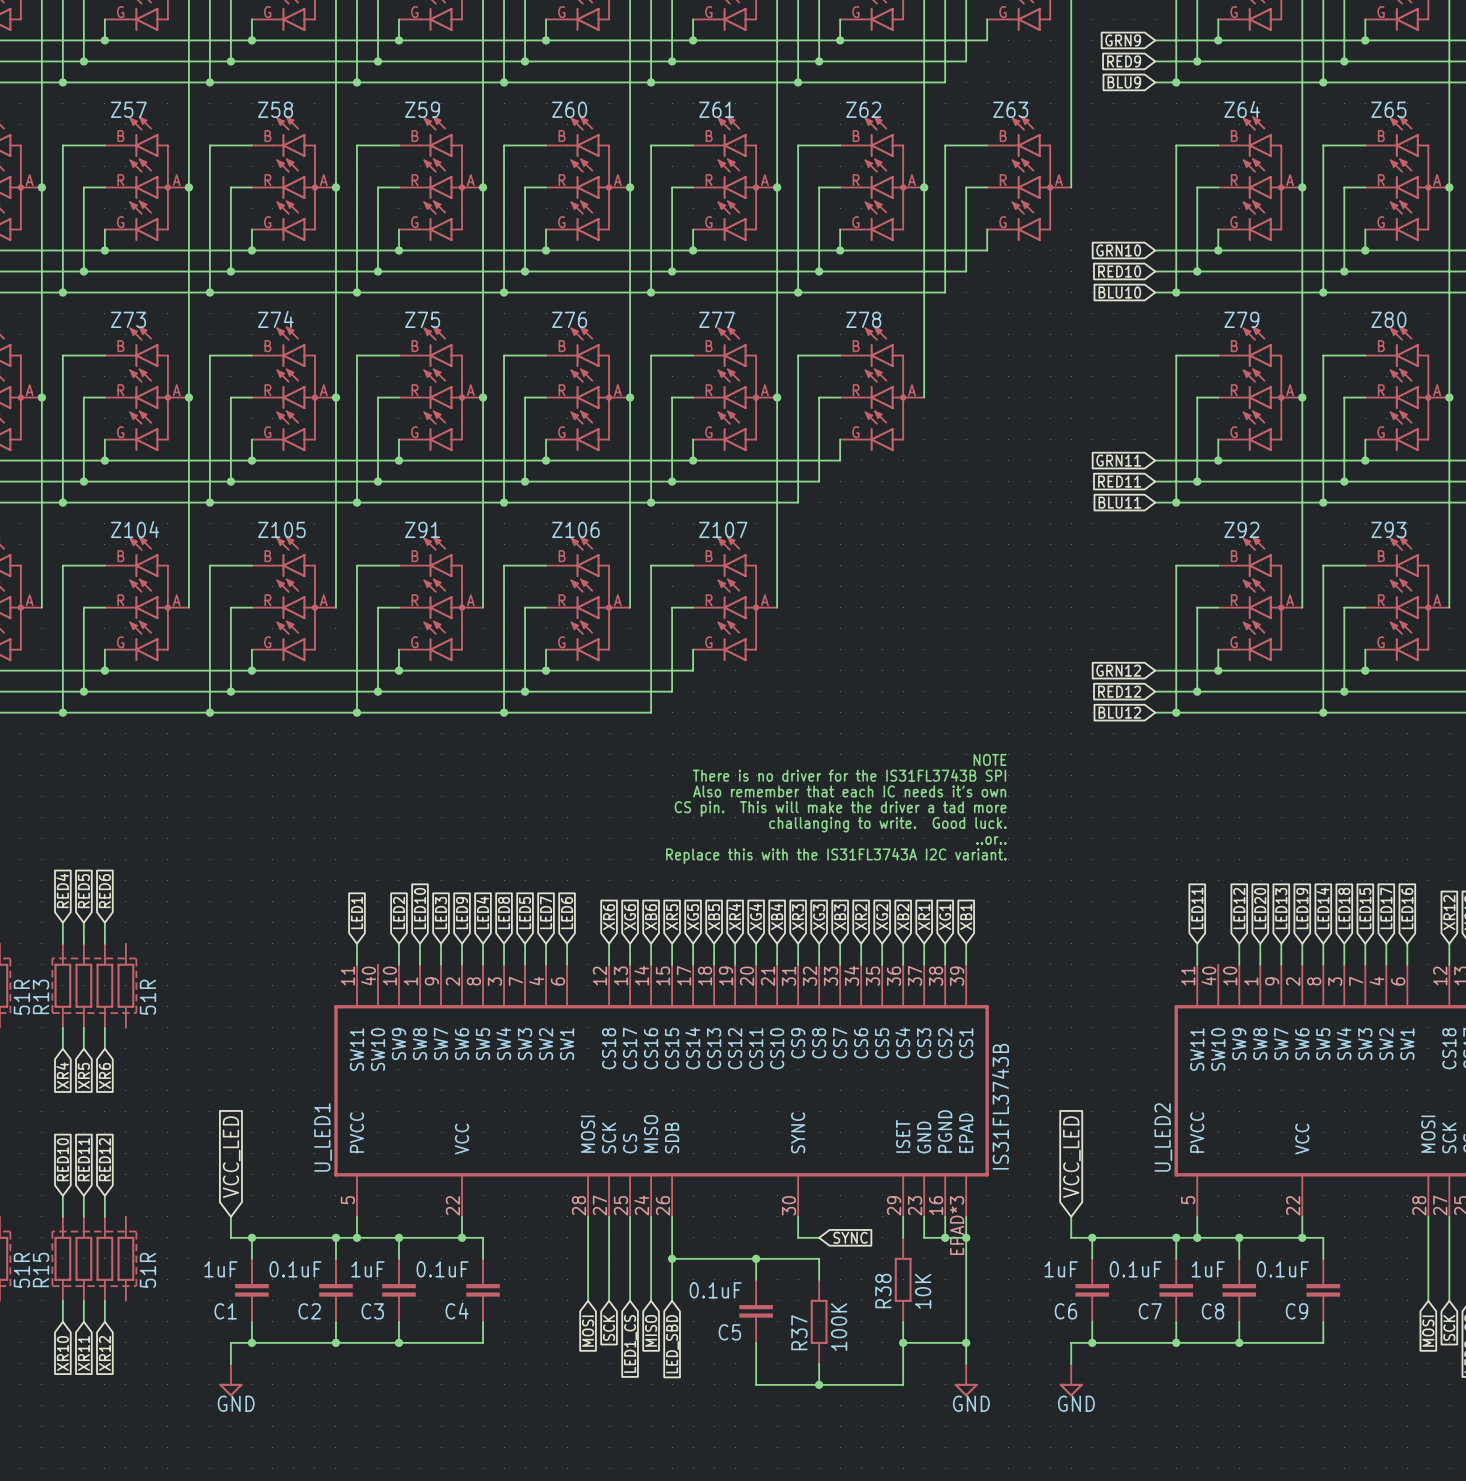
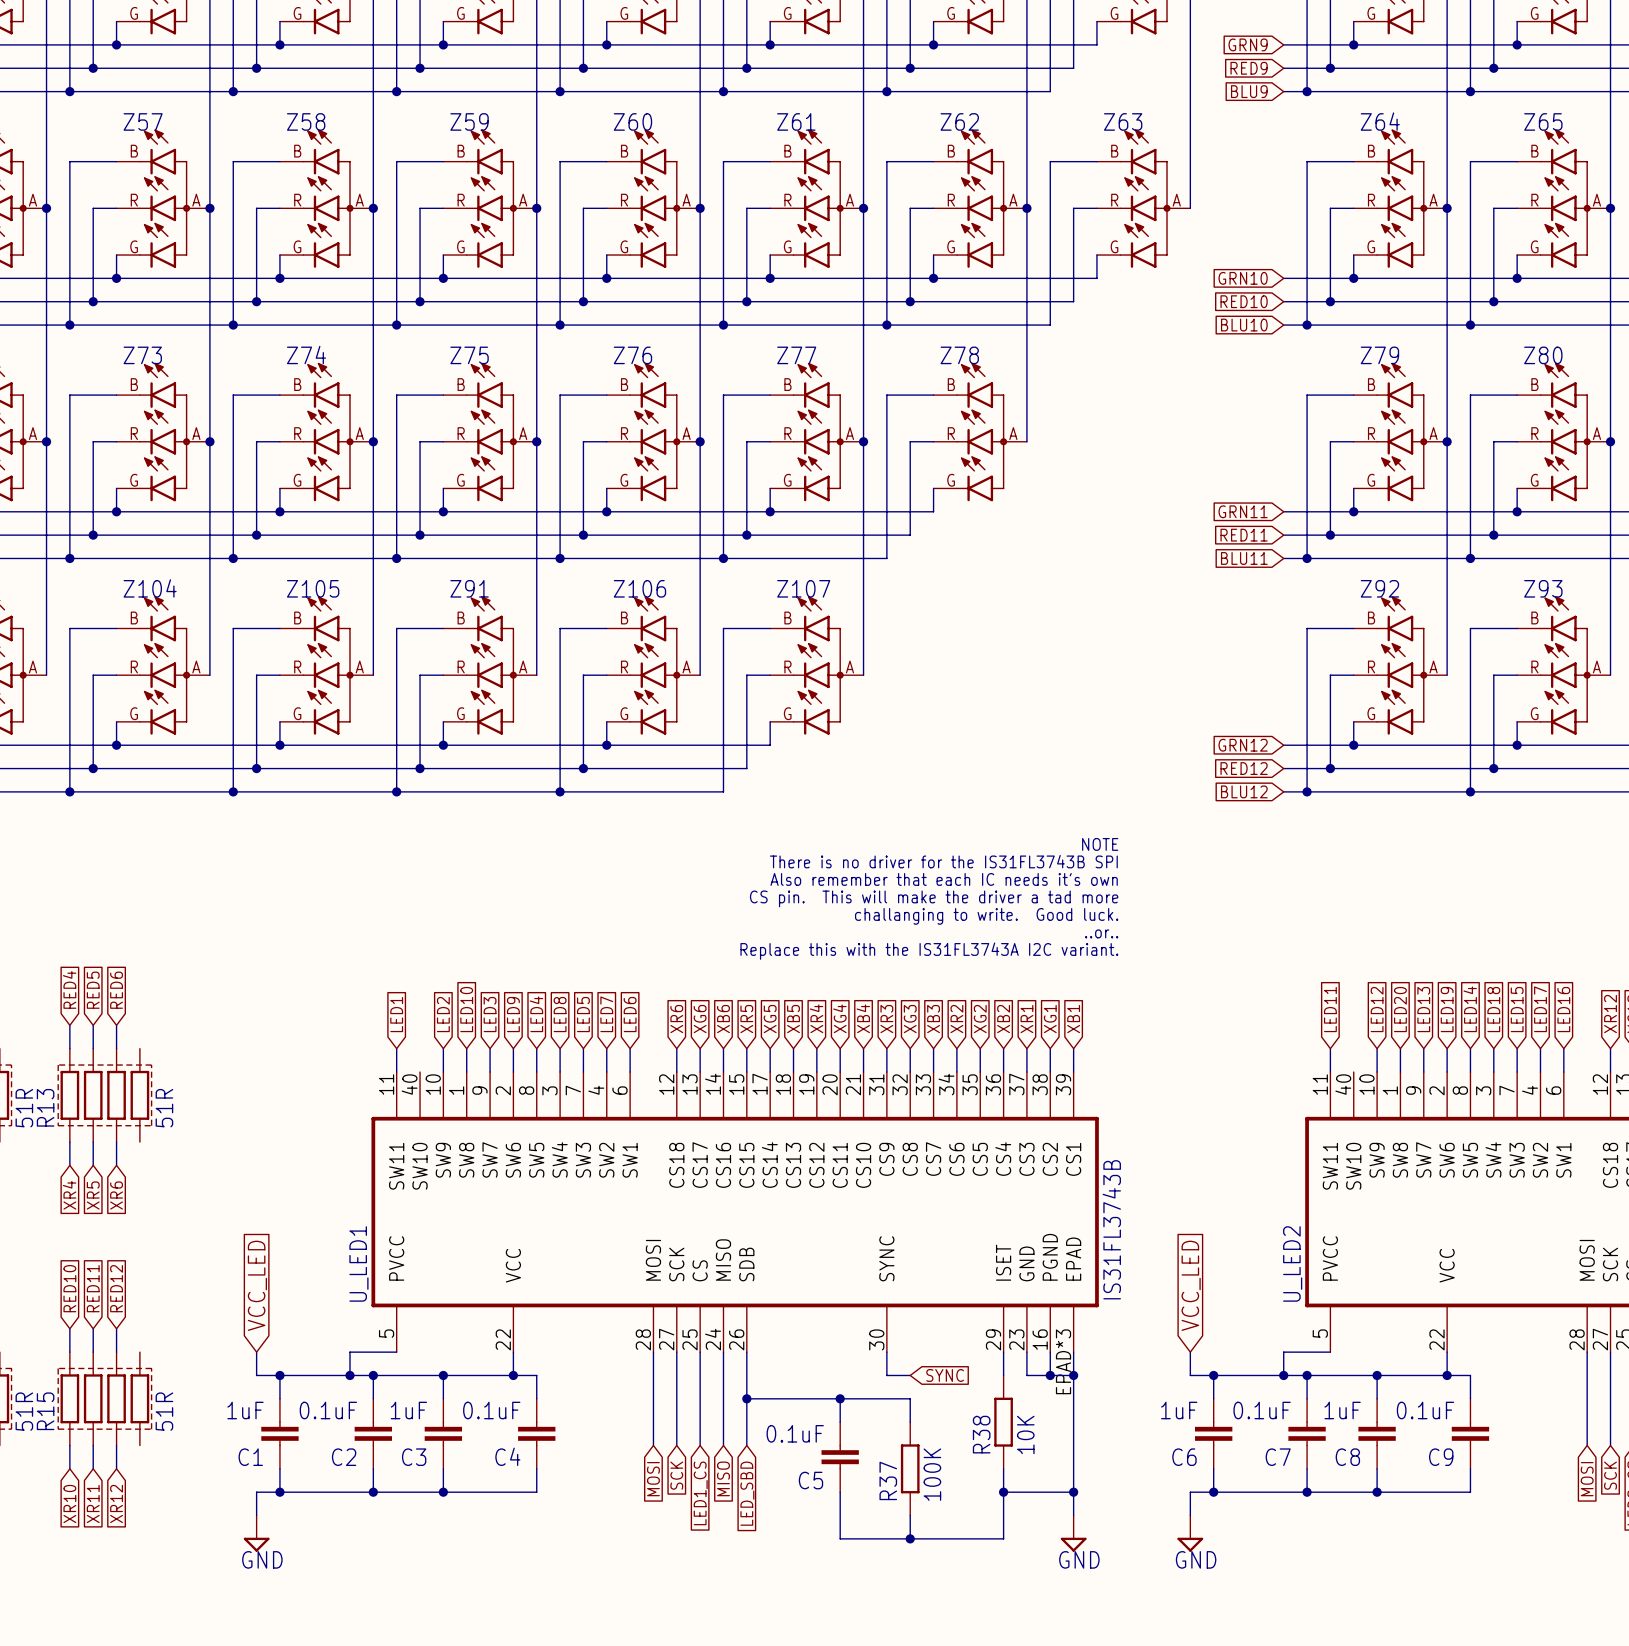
wire: (356, 1216) (356, 1237) -> (396, 1352) (349, 1352) (349, 1375)
wire: (1197, 1216) (1197, 1237) -> (1330, 1352) (1283, 1352) (1283, 1375)
junction position: (356, 1237) -> (349, 1375)
junction position: (1197, 1237) -> (1283, 1375)

